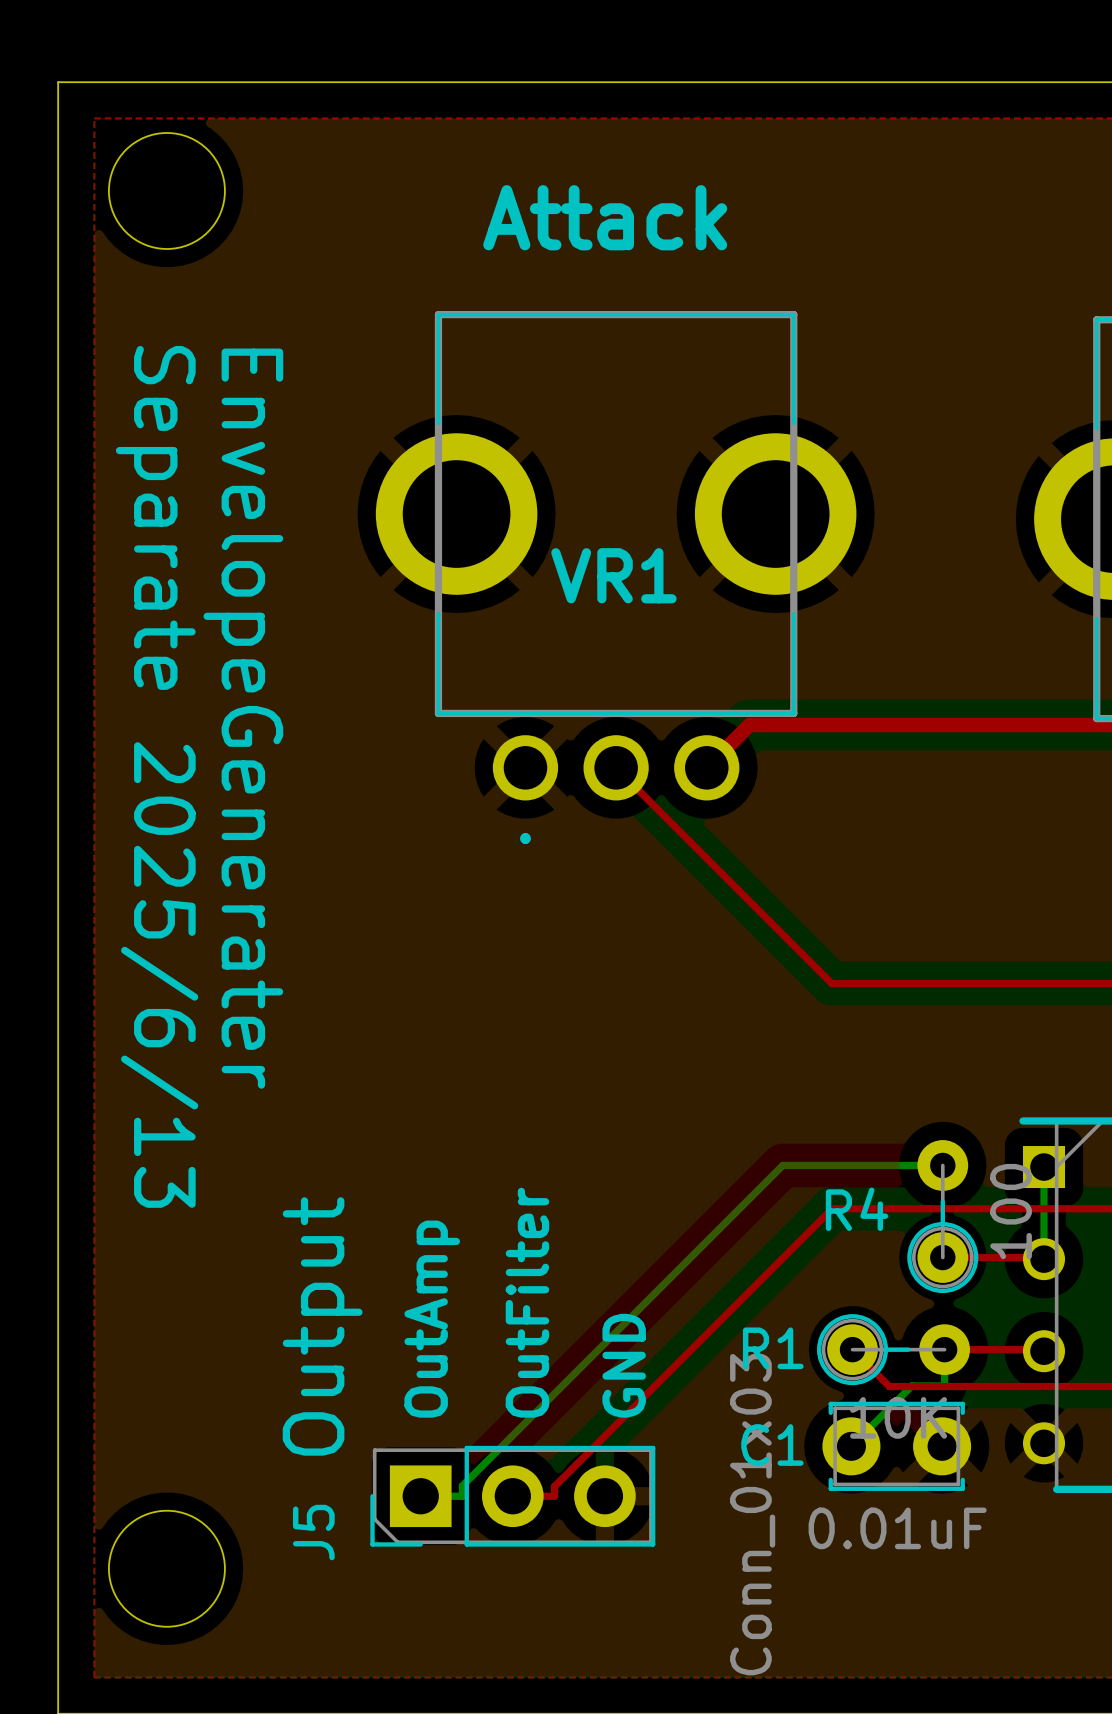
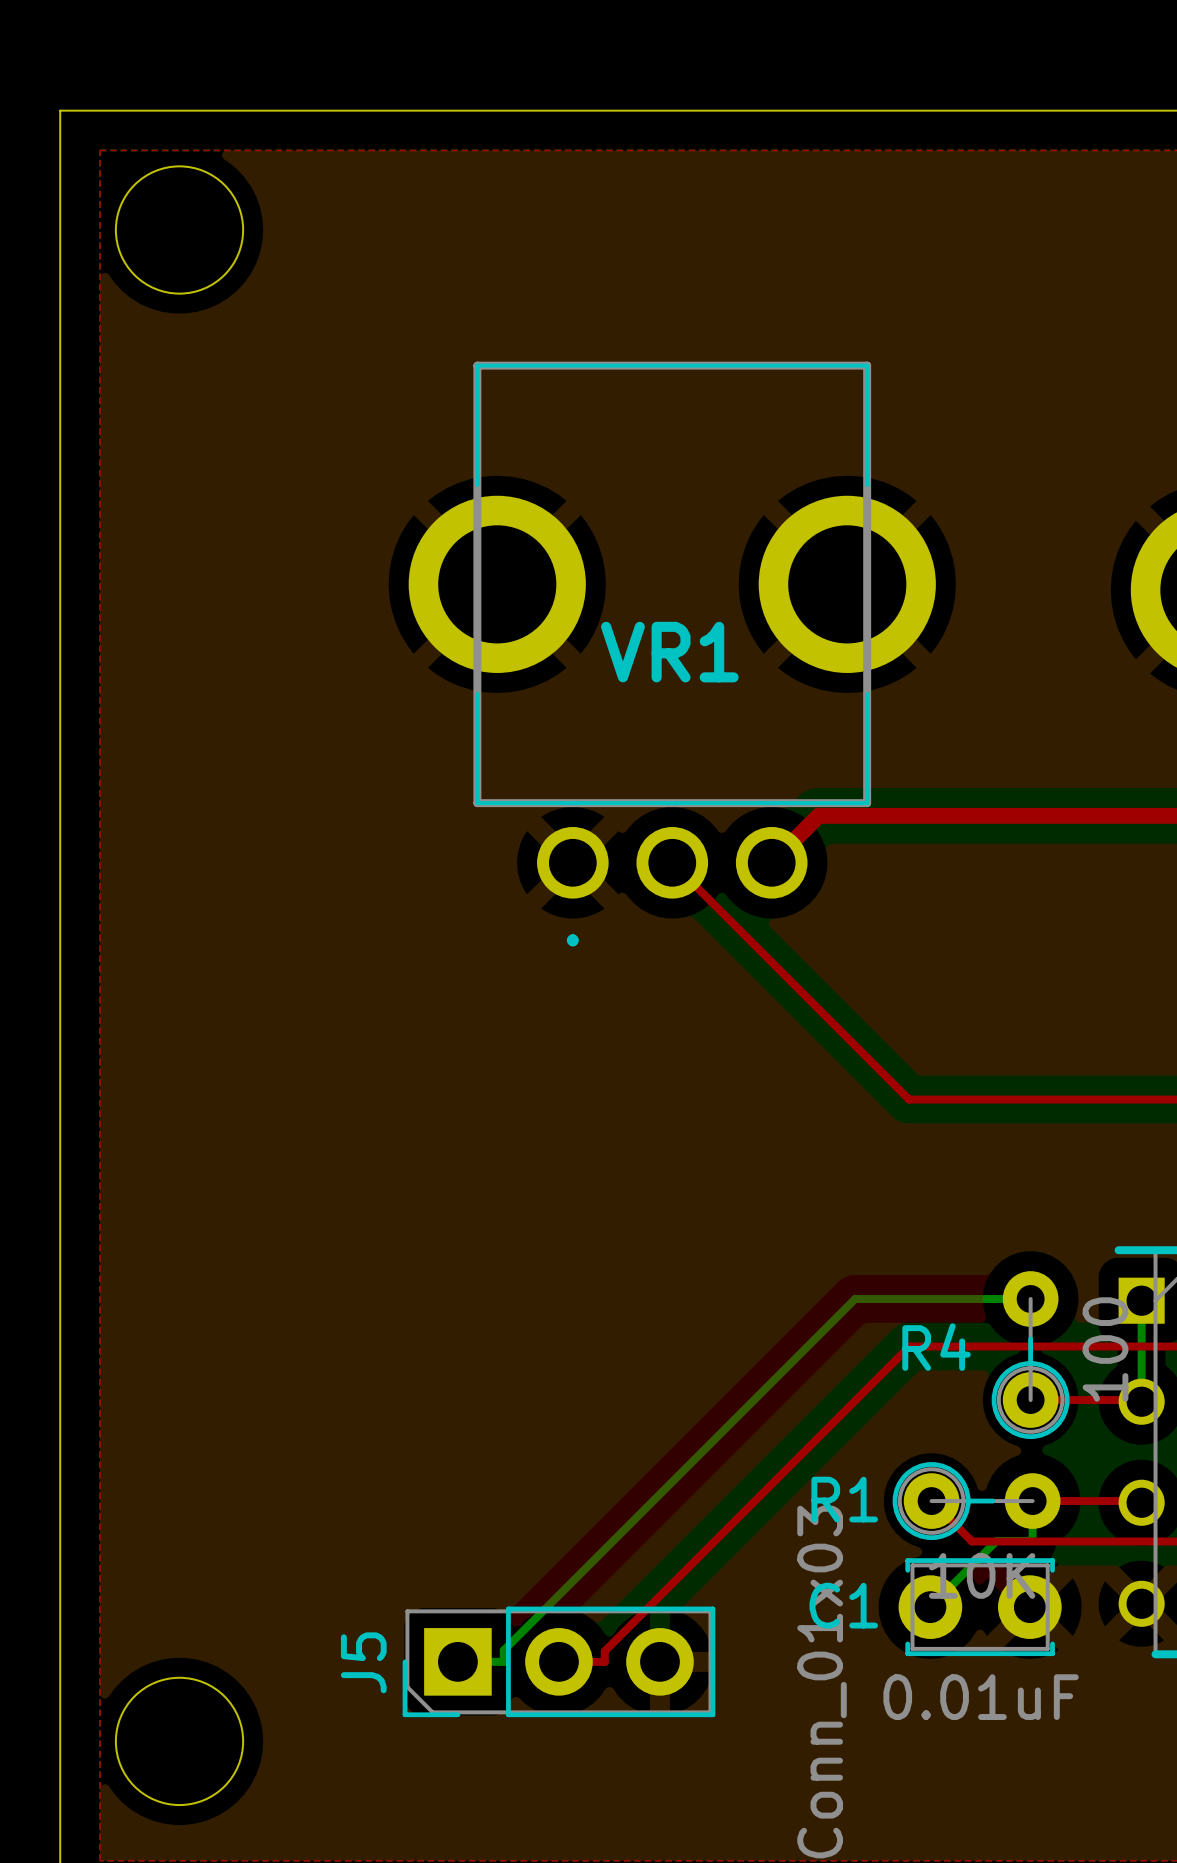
text: Attack (605, 217) -> none
text: EnvelopeGenerater (243, 718) -> none
text: Separate 2025/6/13 (157, 776) -> none
text: OutFilter (527, 1302) -> none
text: OutAmp (432, 1319) -> none
text: Output (322, 1326) -> none
text: GND (624, 1365) -> none
J5 name position: J5 (313, 1532) -> J5 (363, 1662)

